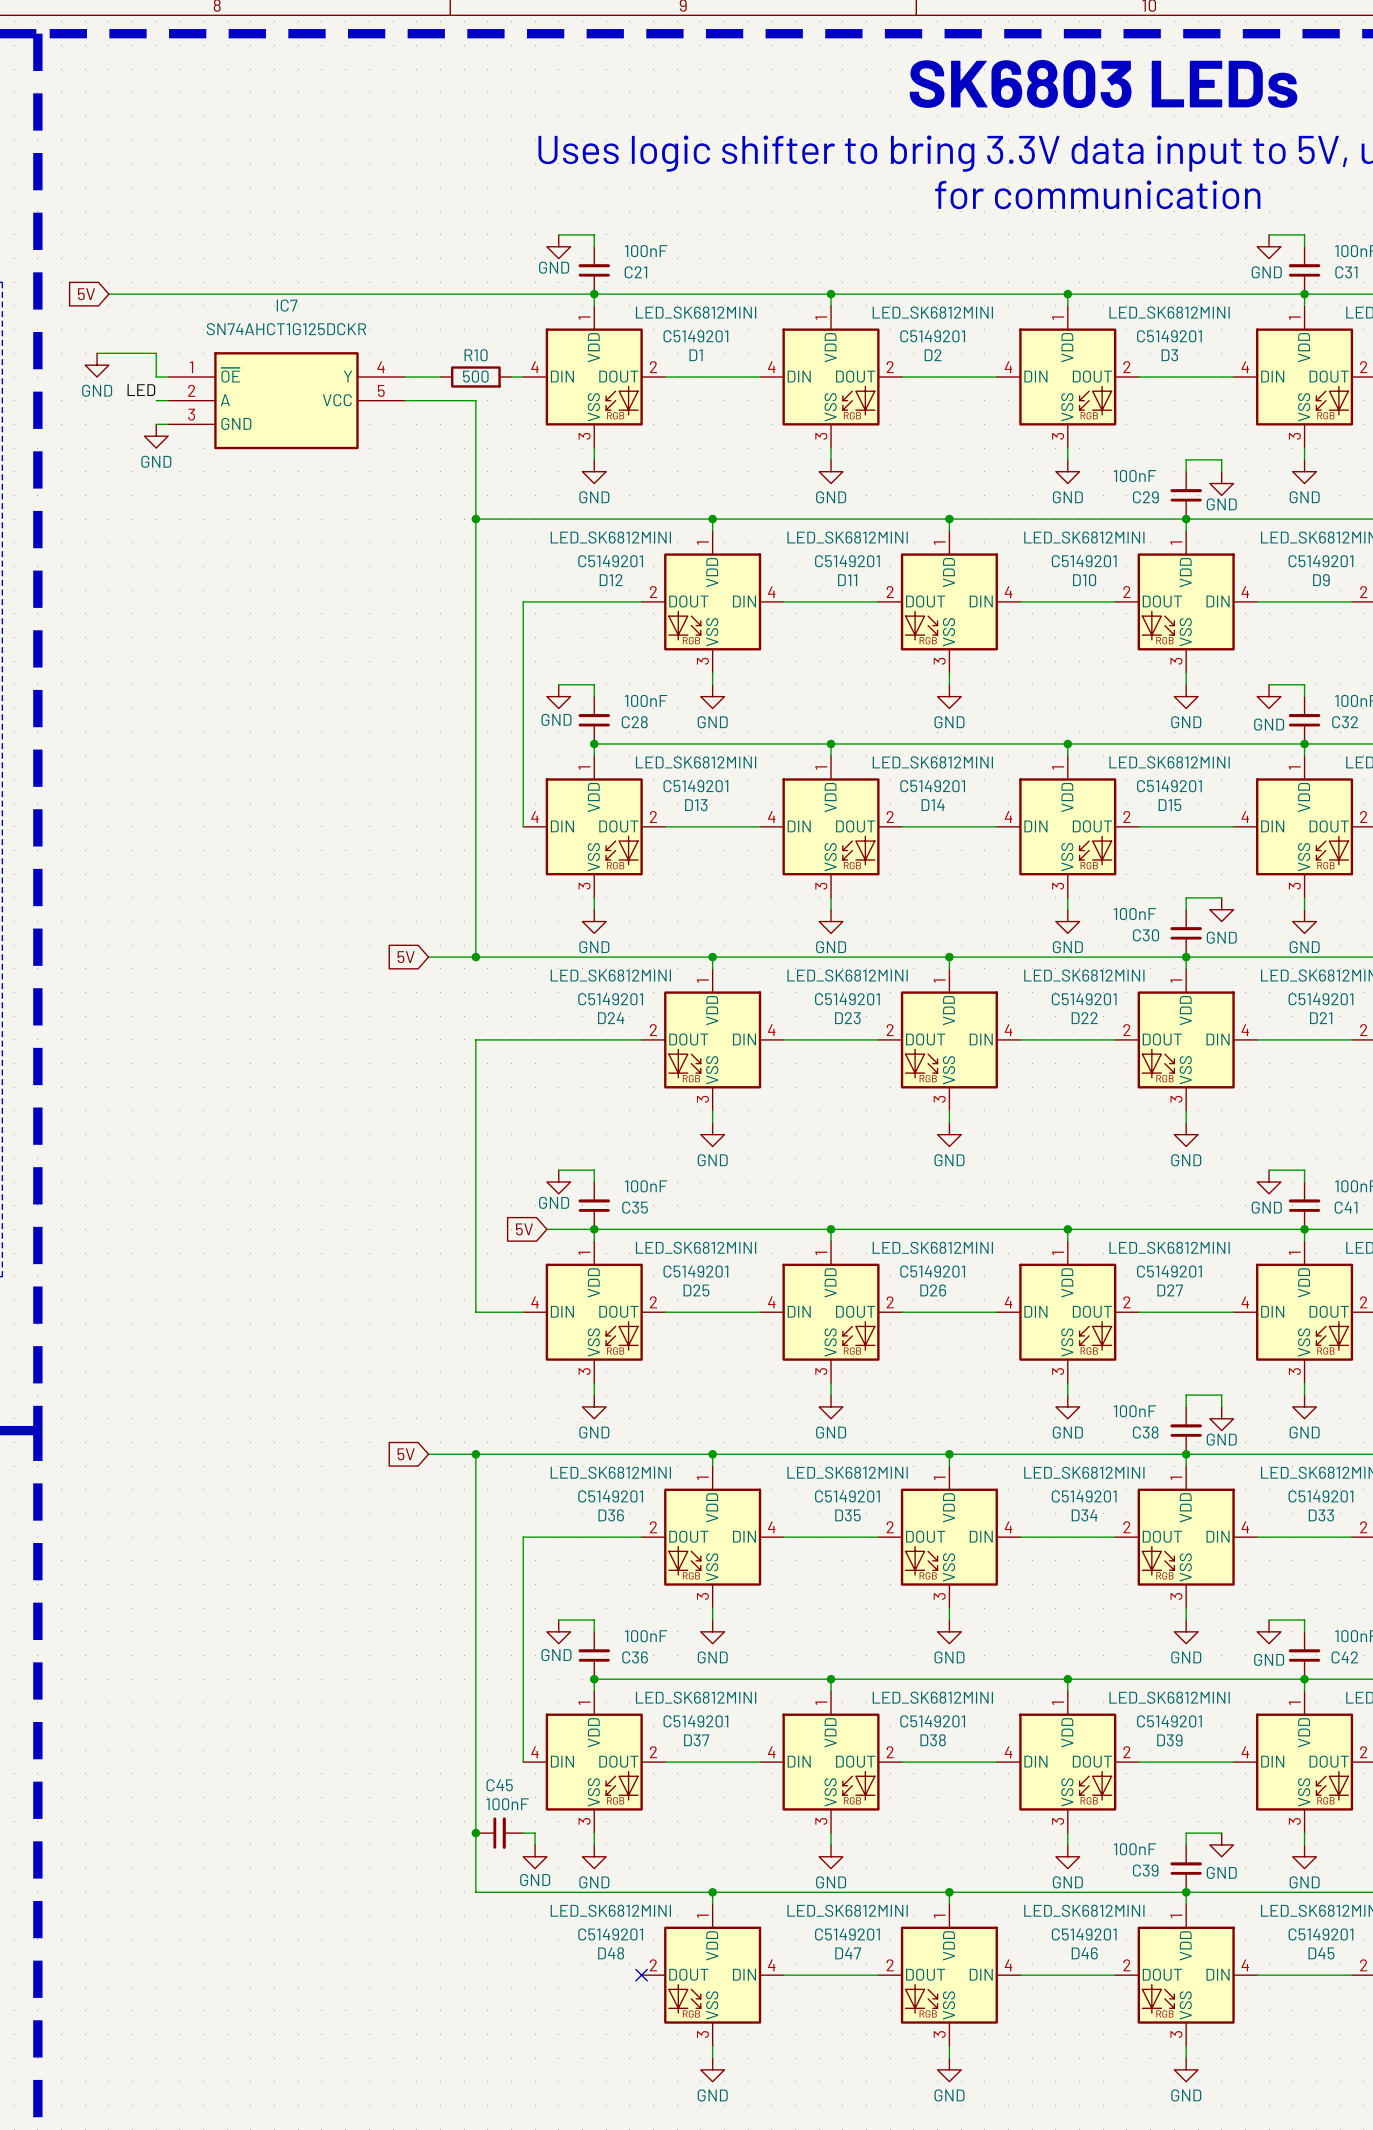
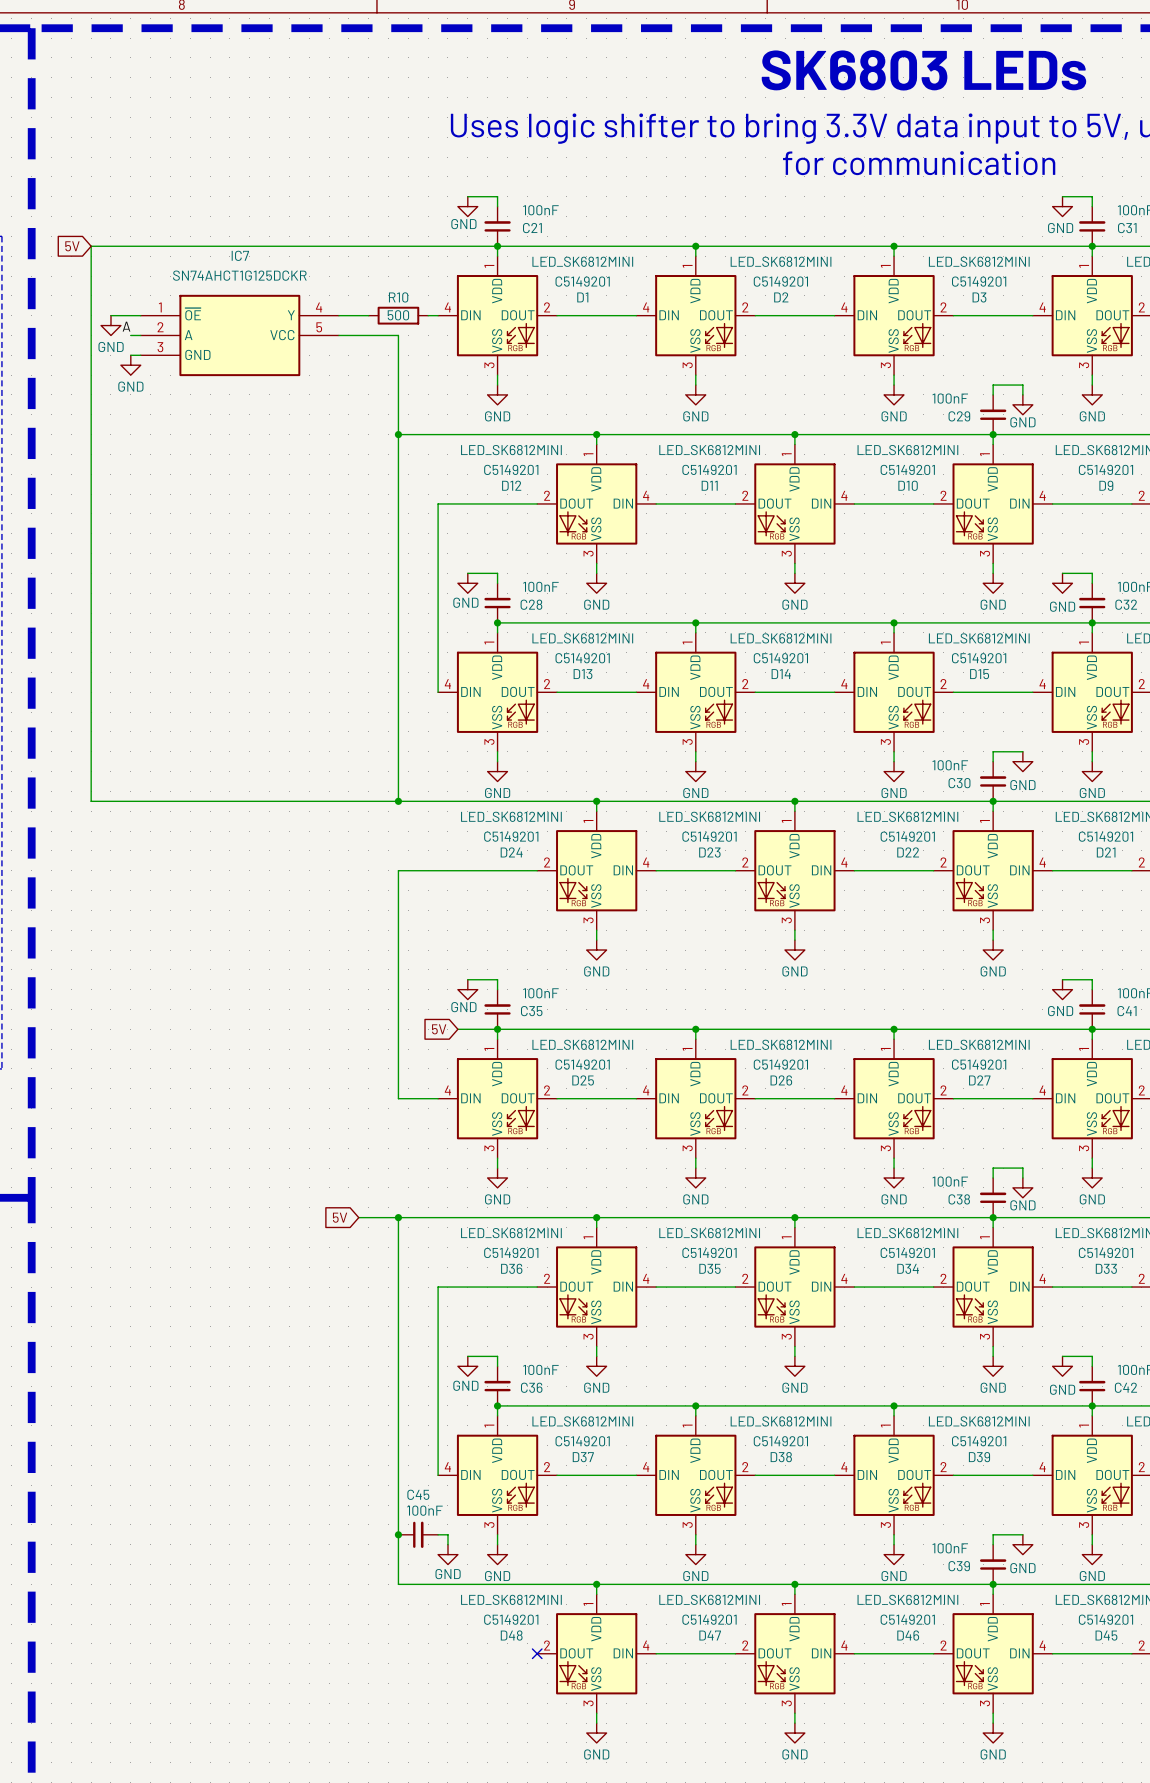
wire: none -> (91, 246) (91, 801) (358, 801)
wire: (97, 353) (156, 353) (156, 377) -> (110, 315) (130, 315)
power symbol position: GND (97, 365) -> GND (110, 325)
label: LED (141, 390) -> A (126, 326)
global label: 5V (406, 957) -> none

